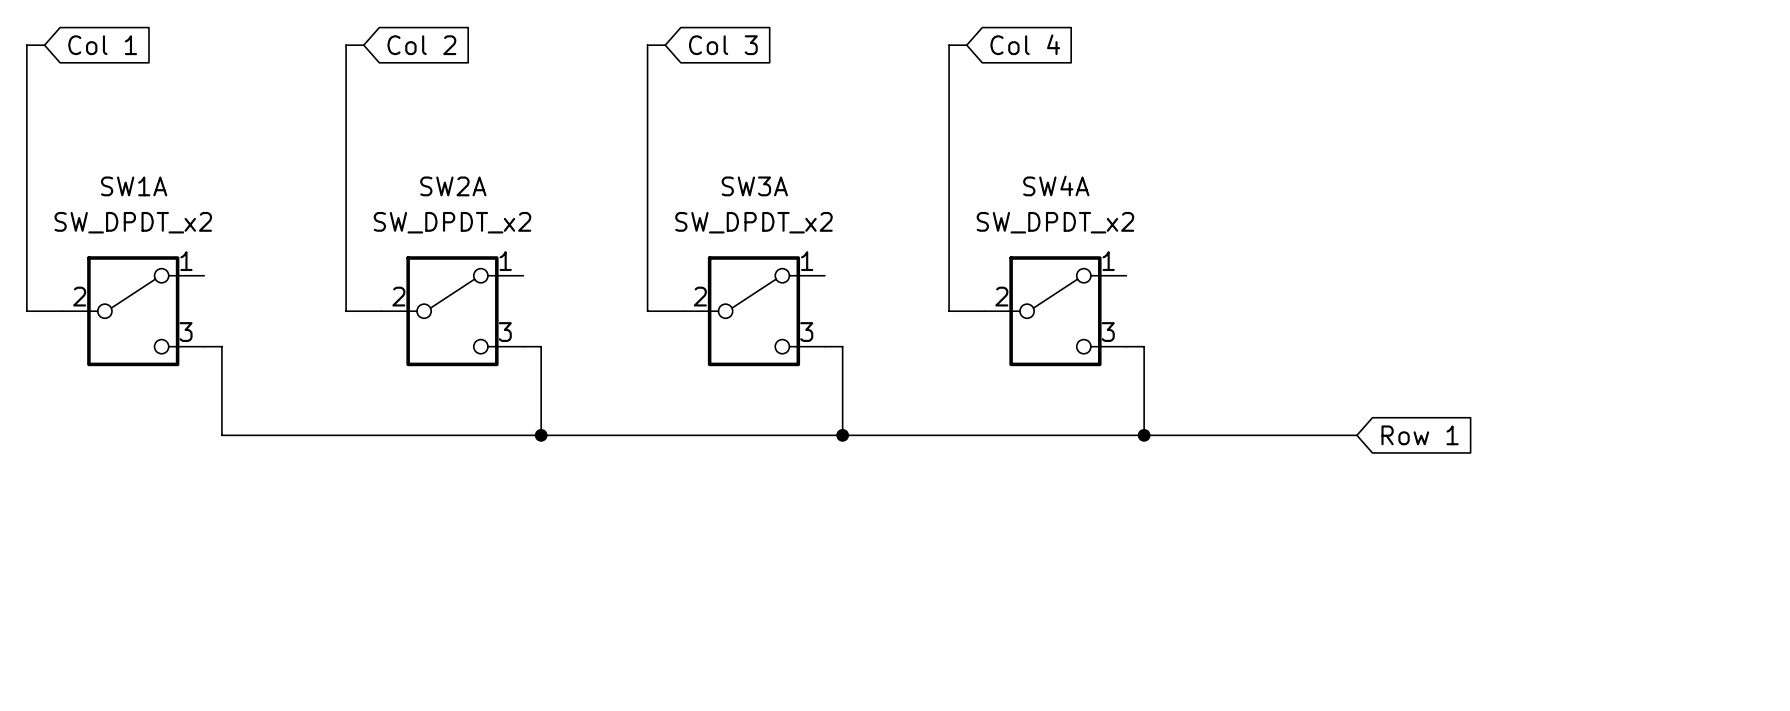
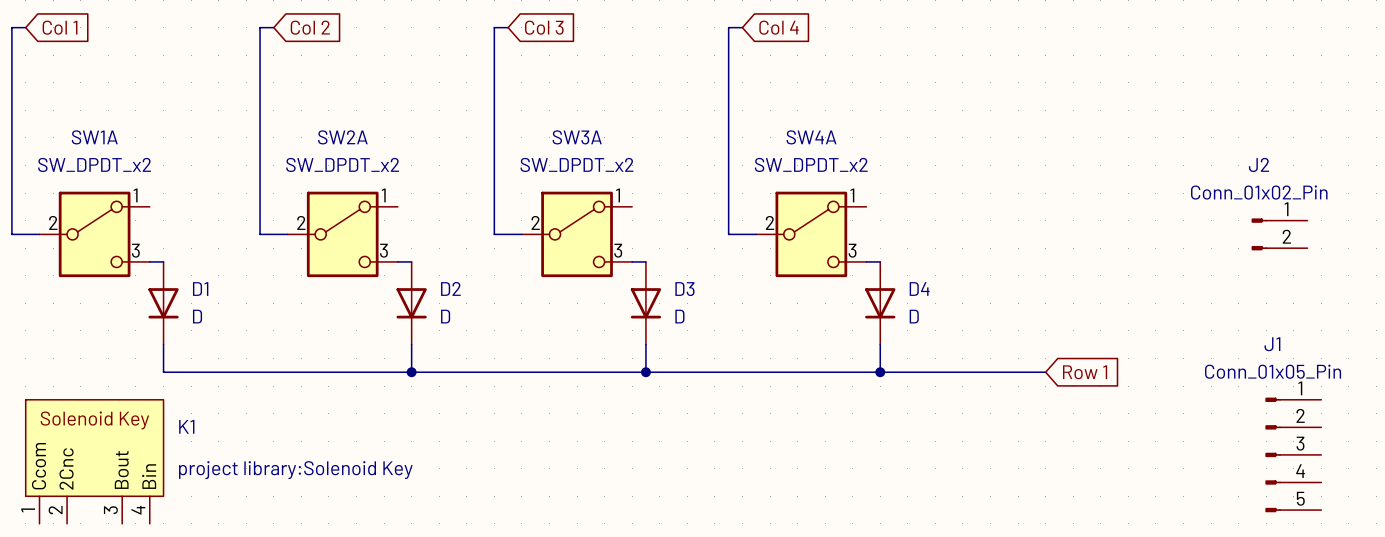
J2: none -> Conn_01x02_Pin (1279, 234)
wire: (221, 346) (221, 435) (1356, 435) -> none
D1: none -> D (163, 303)
D2: none -> D (411, 303)
D3: none -> D (645, 303)
D4: none -> D (880, 303)
junction position: (541, 435) -> (411, 372)
junction position: (842, 435) -> (645, 372)
junction position: (1144, 435) -> (880, 372)
global label position: Row 1 (1420, 435) -> Row 1 (1085, 372)
wire: none -> (163, 344) (163, 372) (1045, 372)
wire: none -> (411, 344) (411, 372)
wire: none -> (645, 344) (645, 372)
wire: none -> (880, 344) (880, 372)
J1: none -> Conn_01x05_Pin (1293, 454)
K1: none -> (94, 461)

